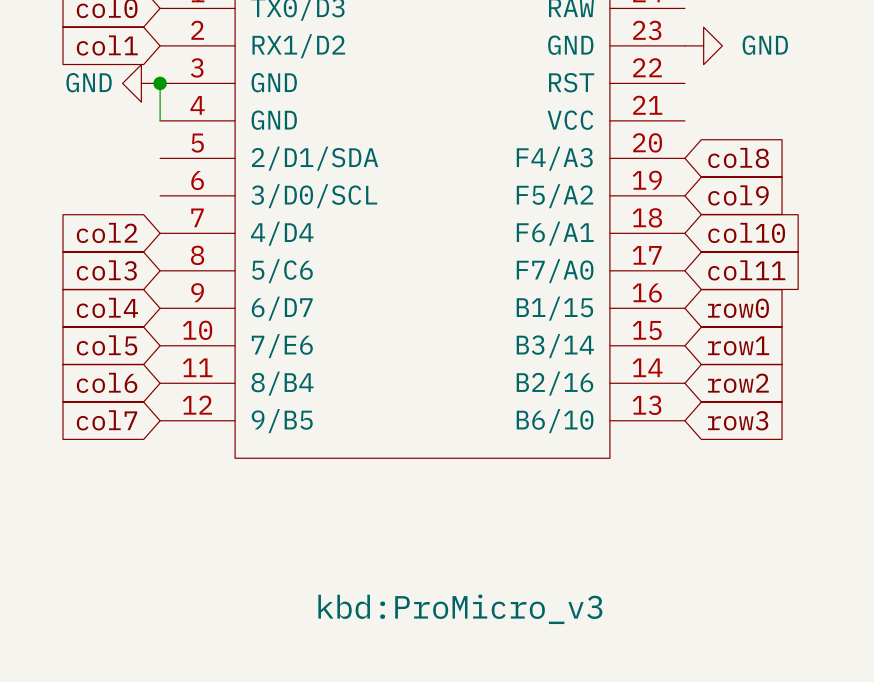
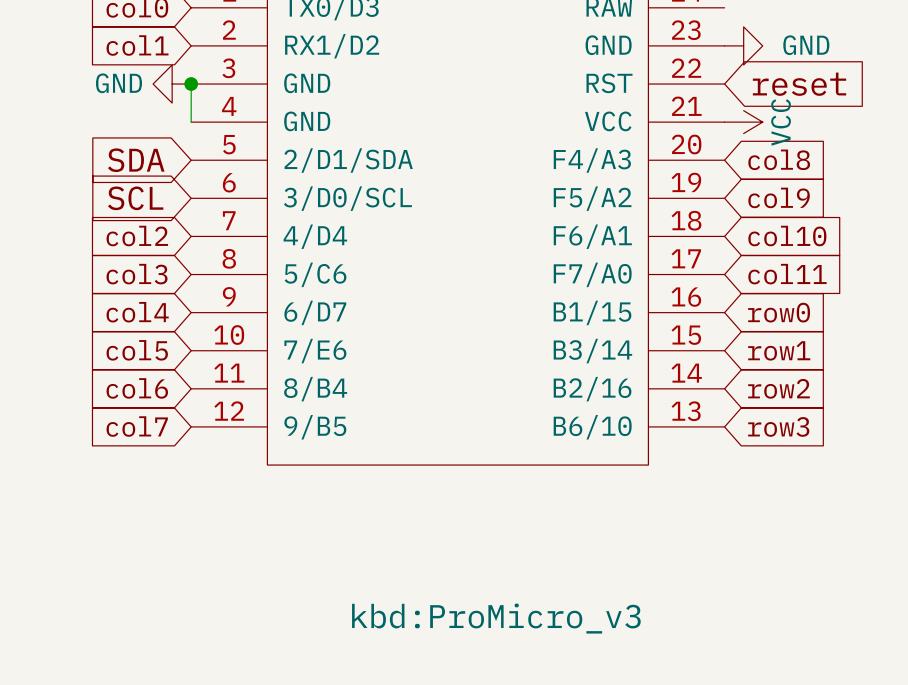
global label: none -> reset (799, 84)
power symbol: none -> VCC (743, 122)
global label: none -> SDA (136, 160)
global label: none -> SCL (135, 198)

